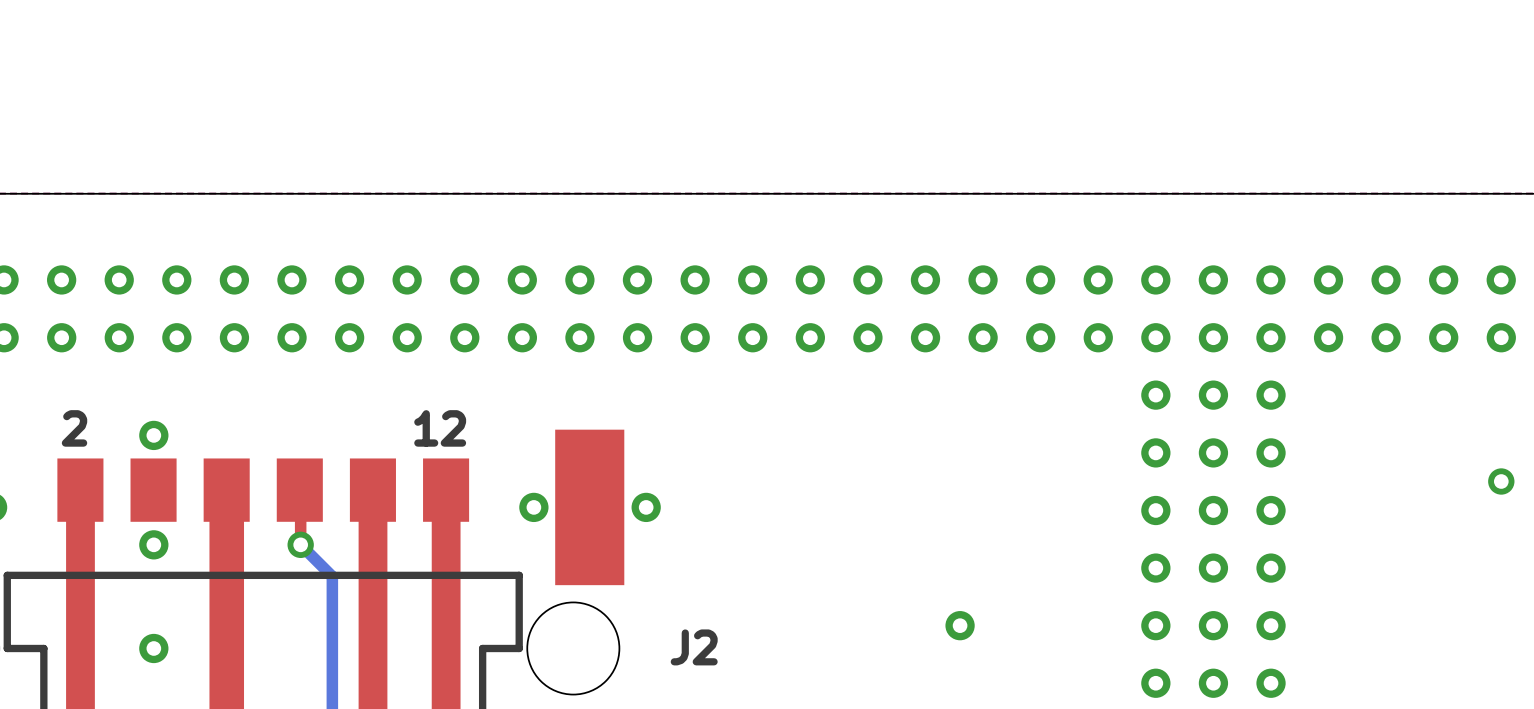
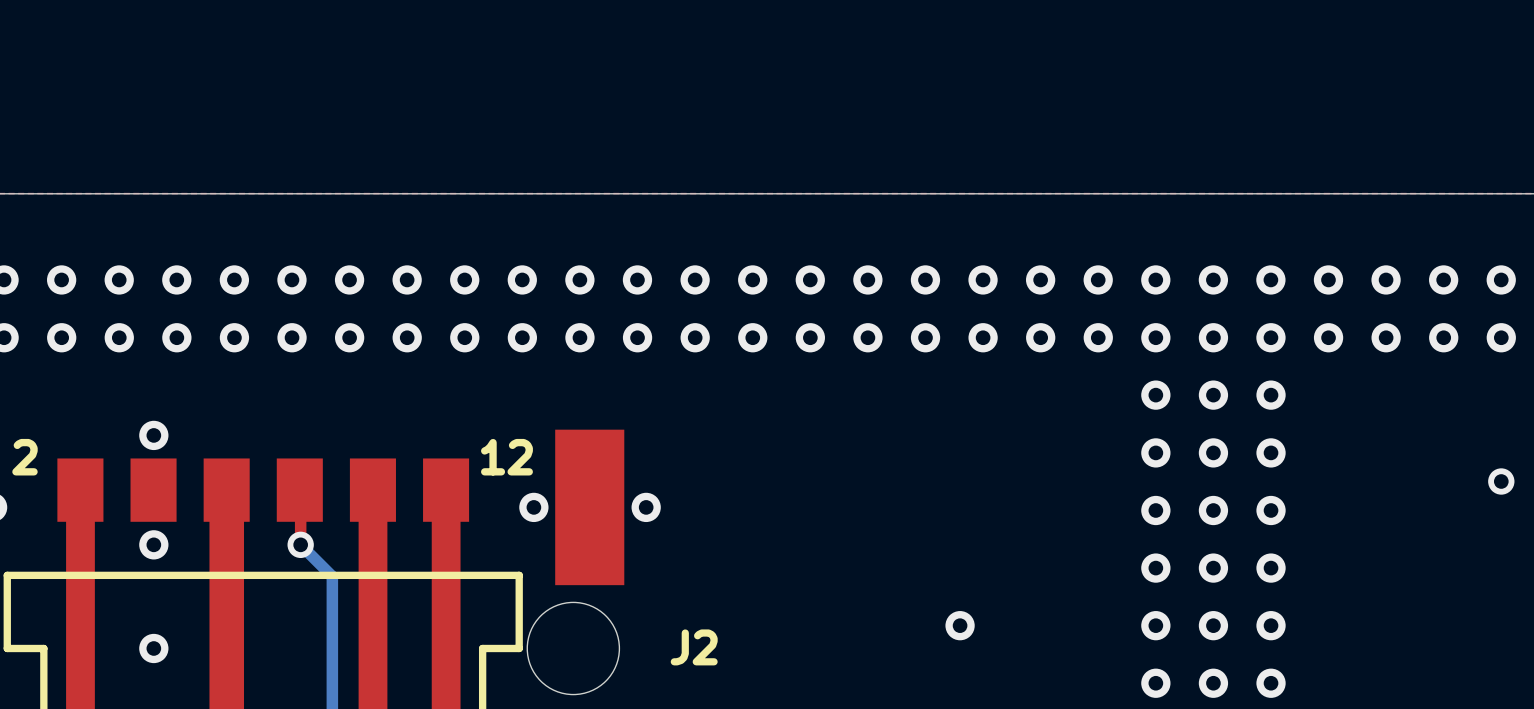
J2 text position: 2 (74, 428) -> 2 (24, 457)
J2 text position: 12 (440, 428) -> 12 (506, 457)

